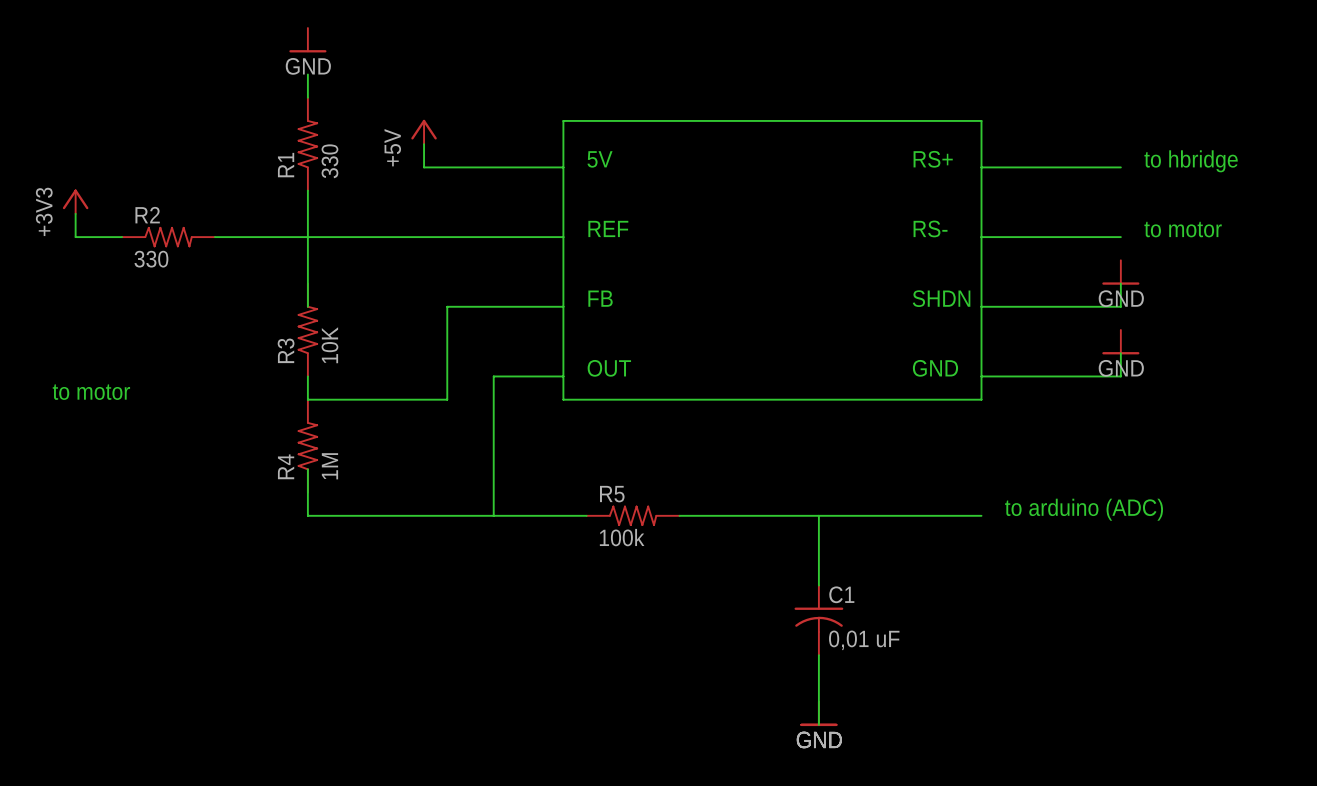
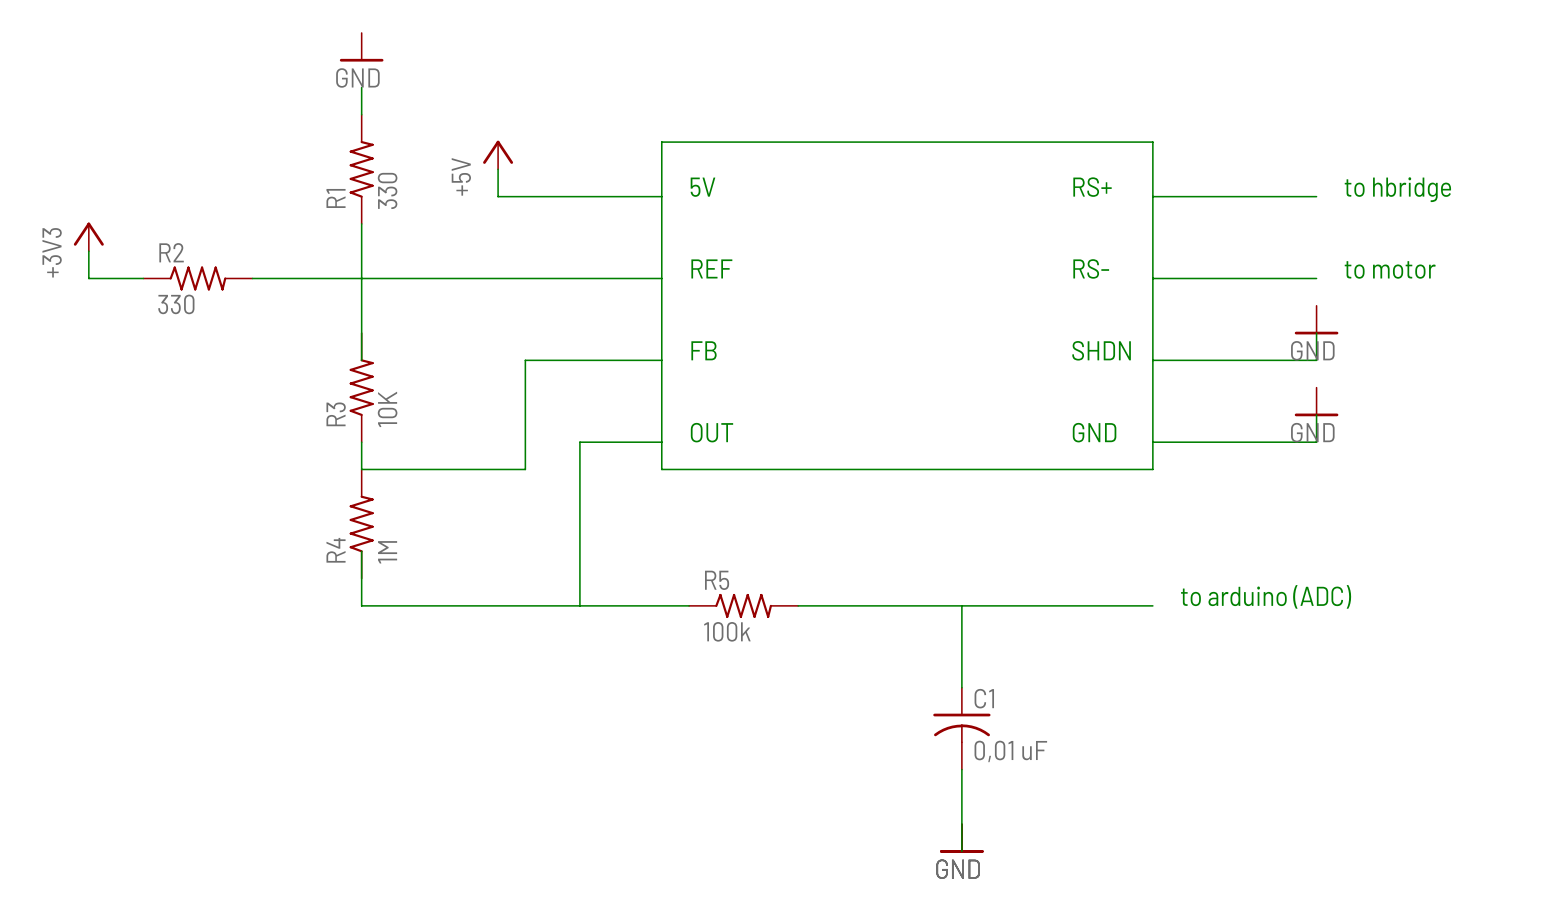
text: to motor (91, 392) -> none

